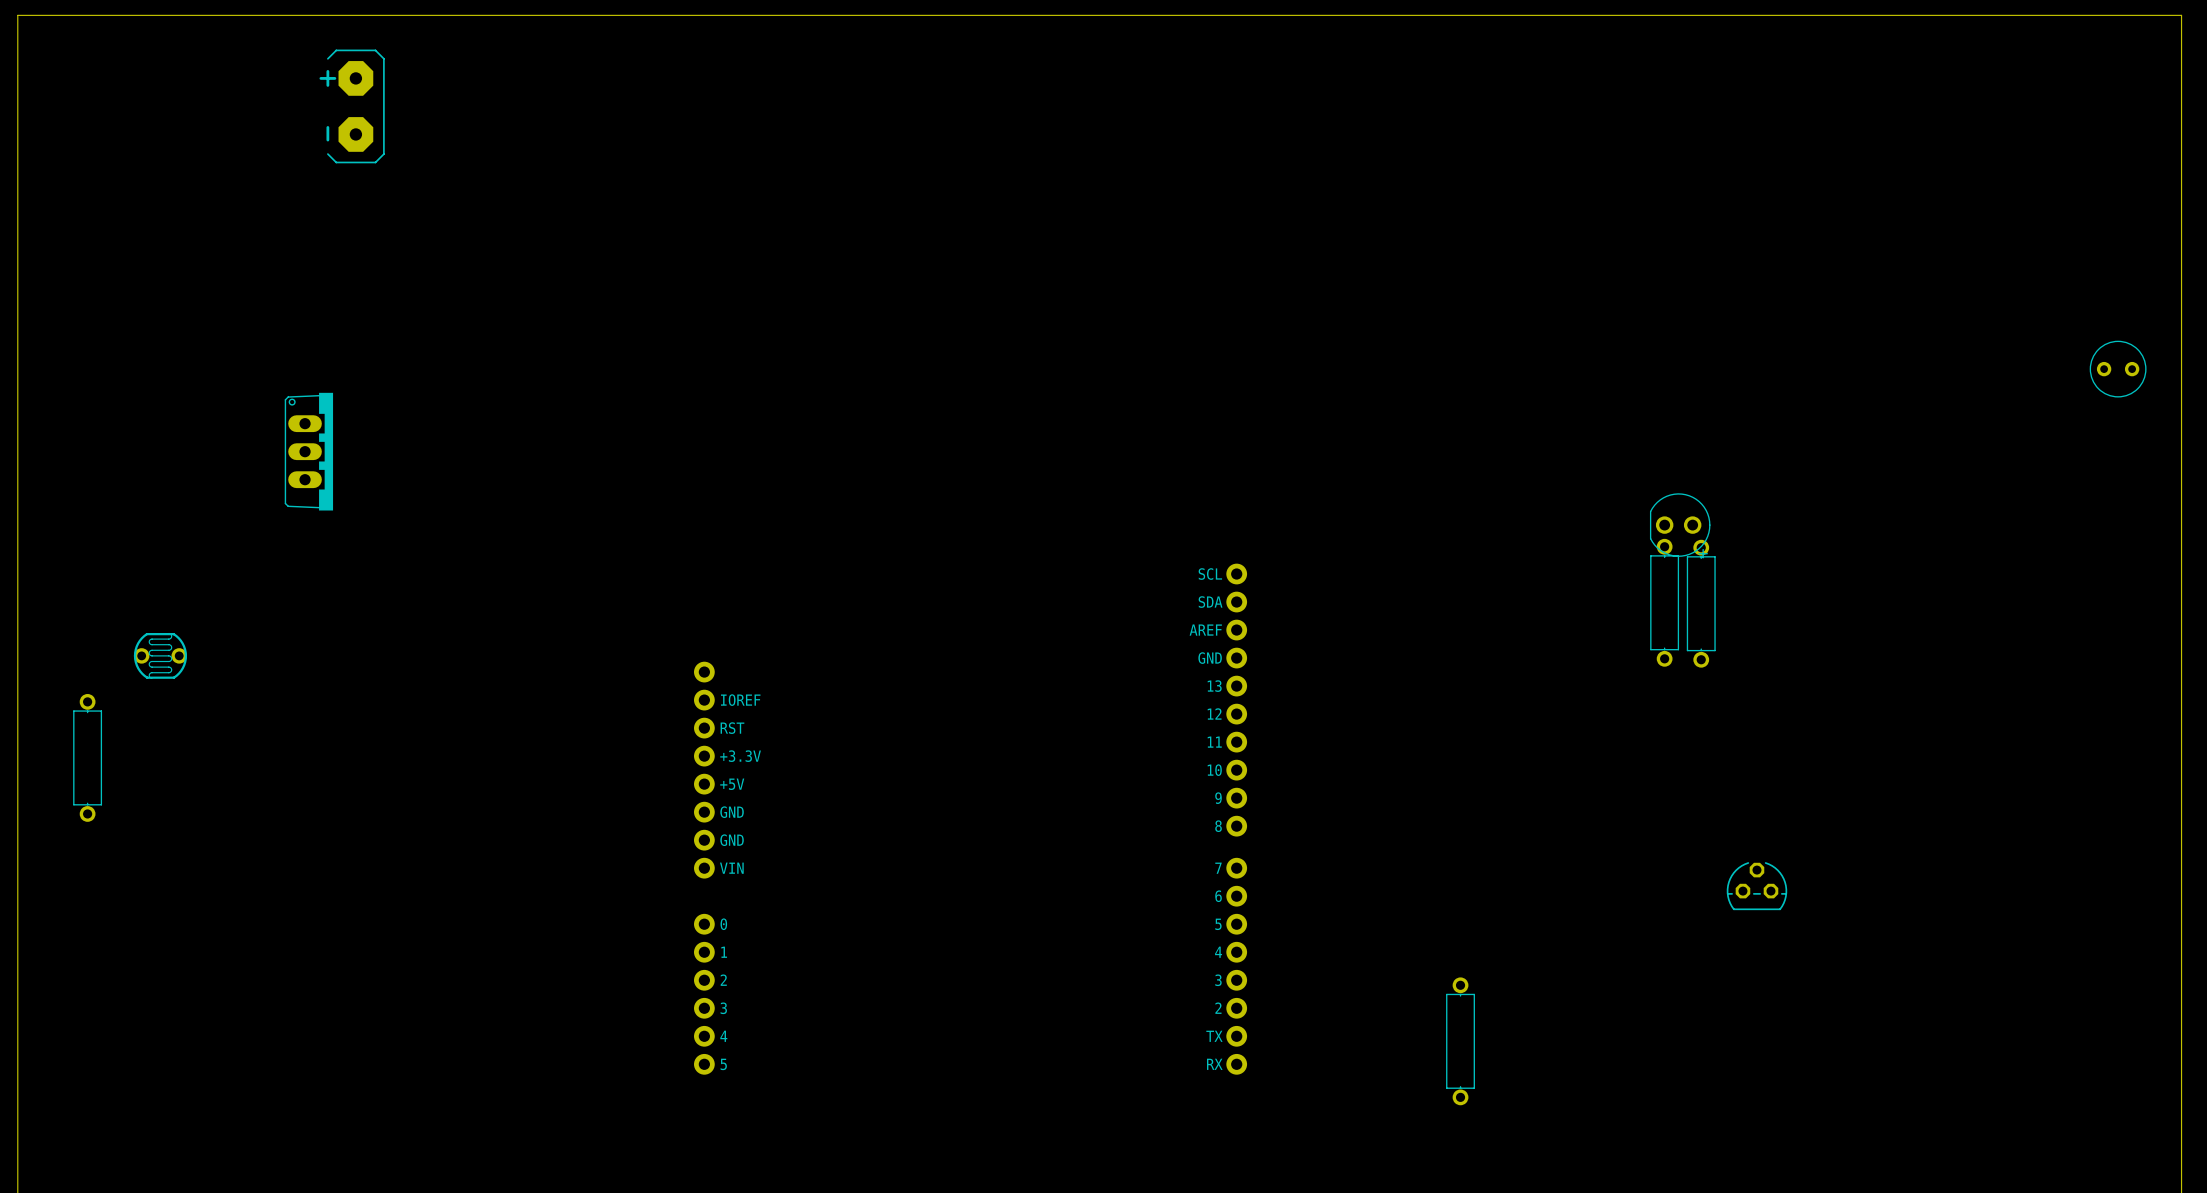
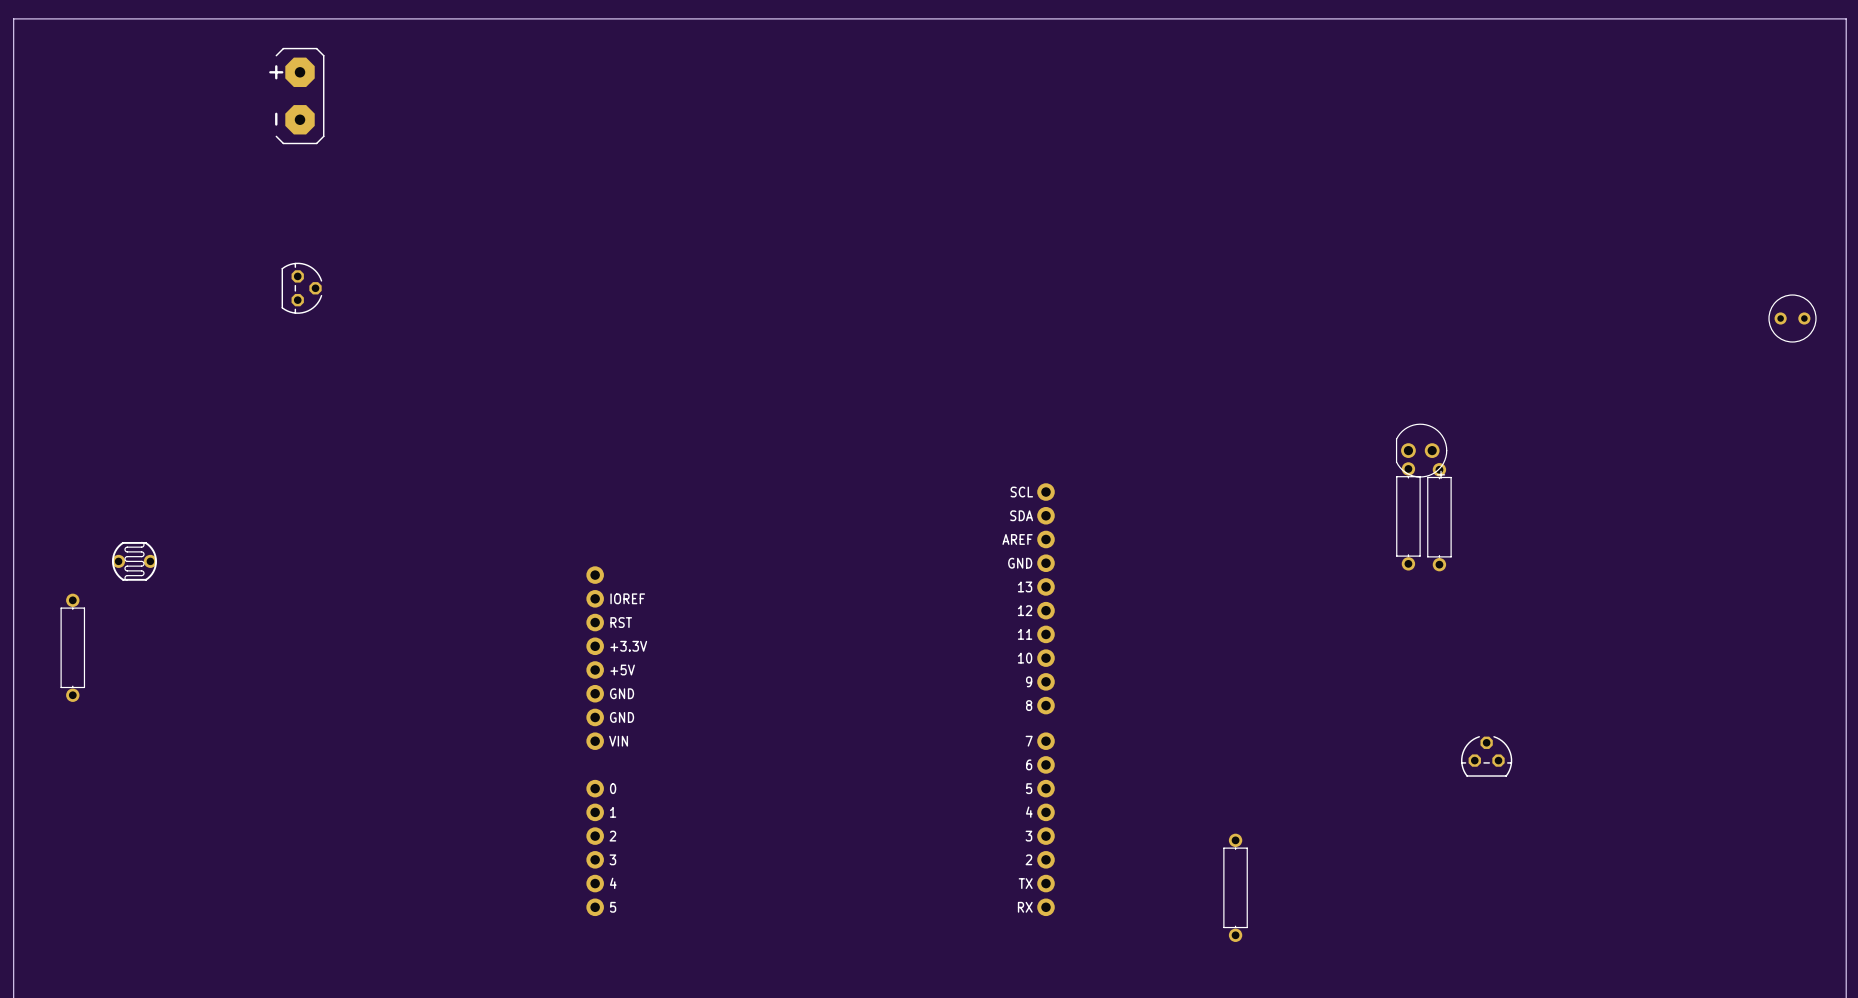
part: none -> (301, 288)
part: (308, 451) -> none

